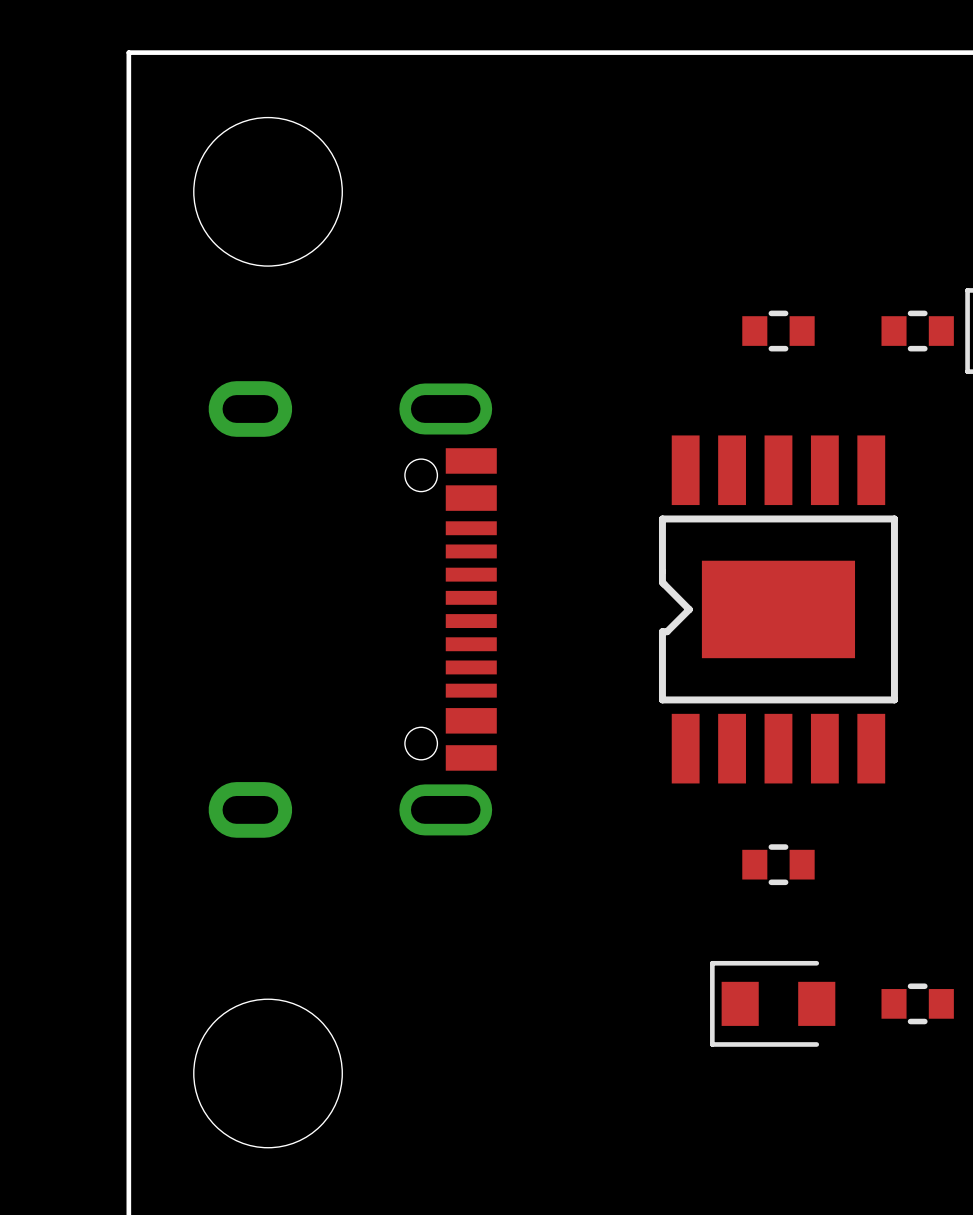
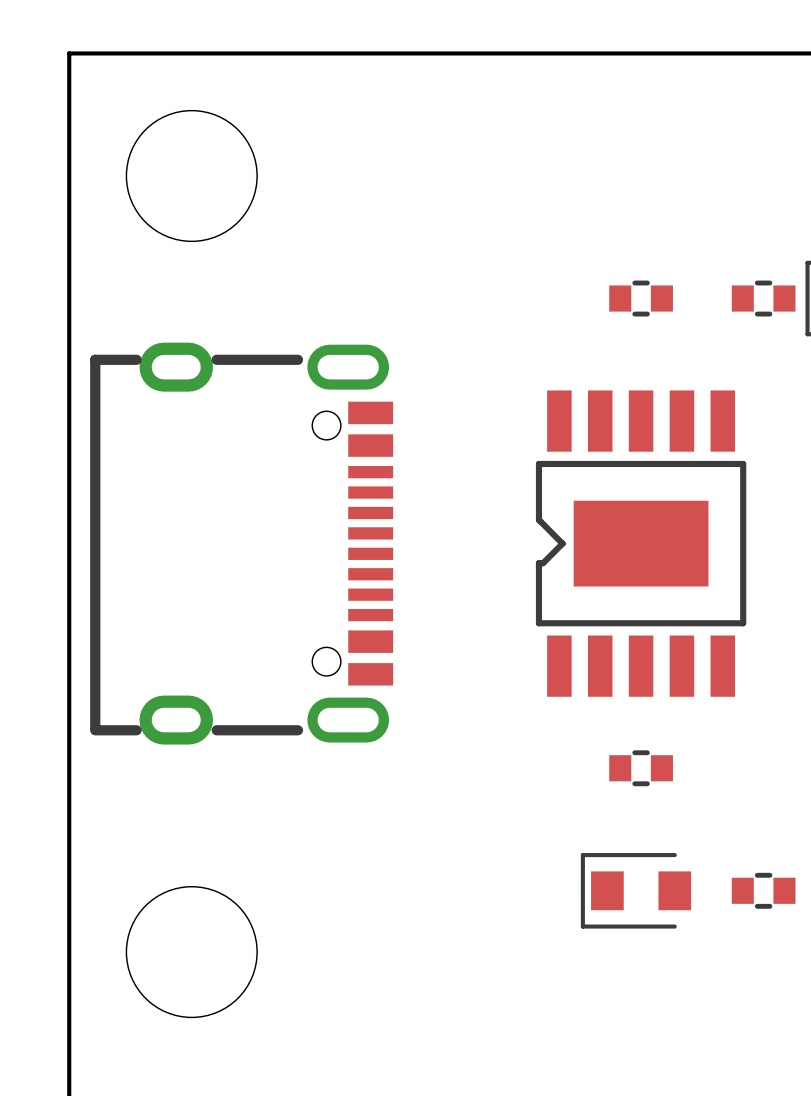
part footprint: [208, 381, 497, 838] -> [90, 342, 394, 745]

